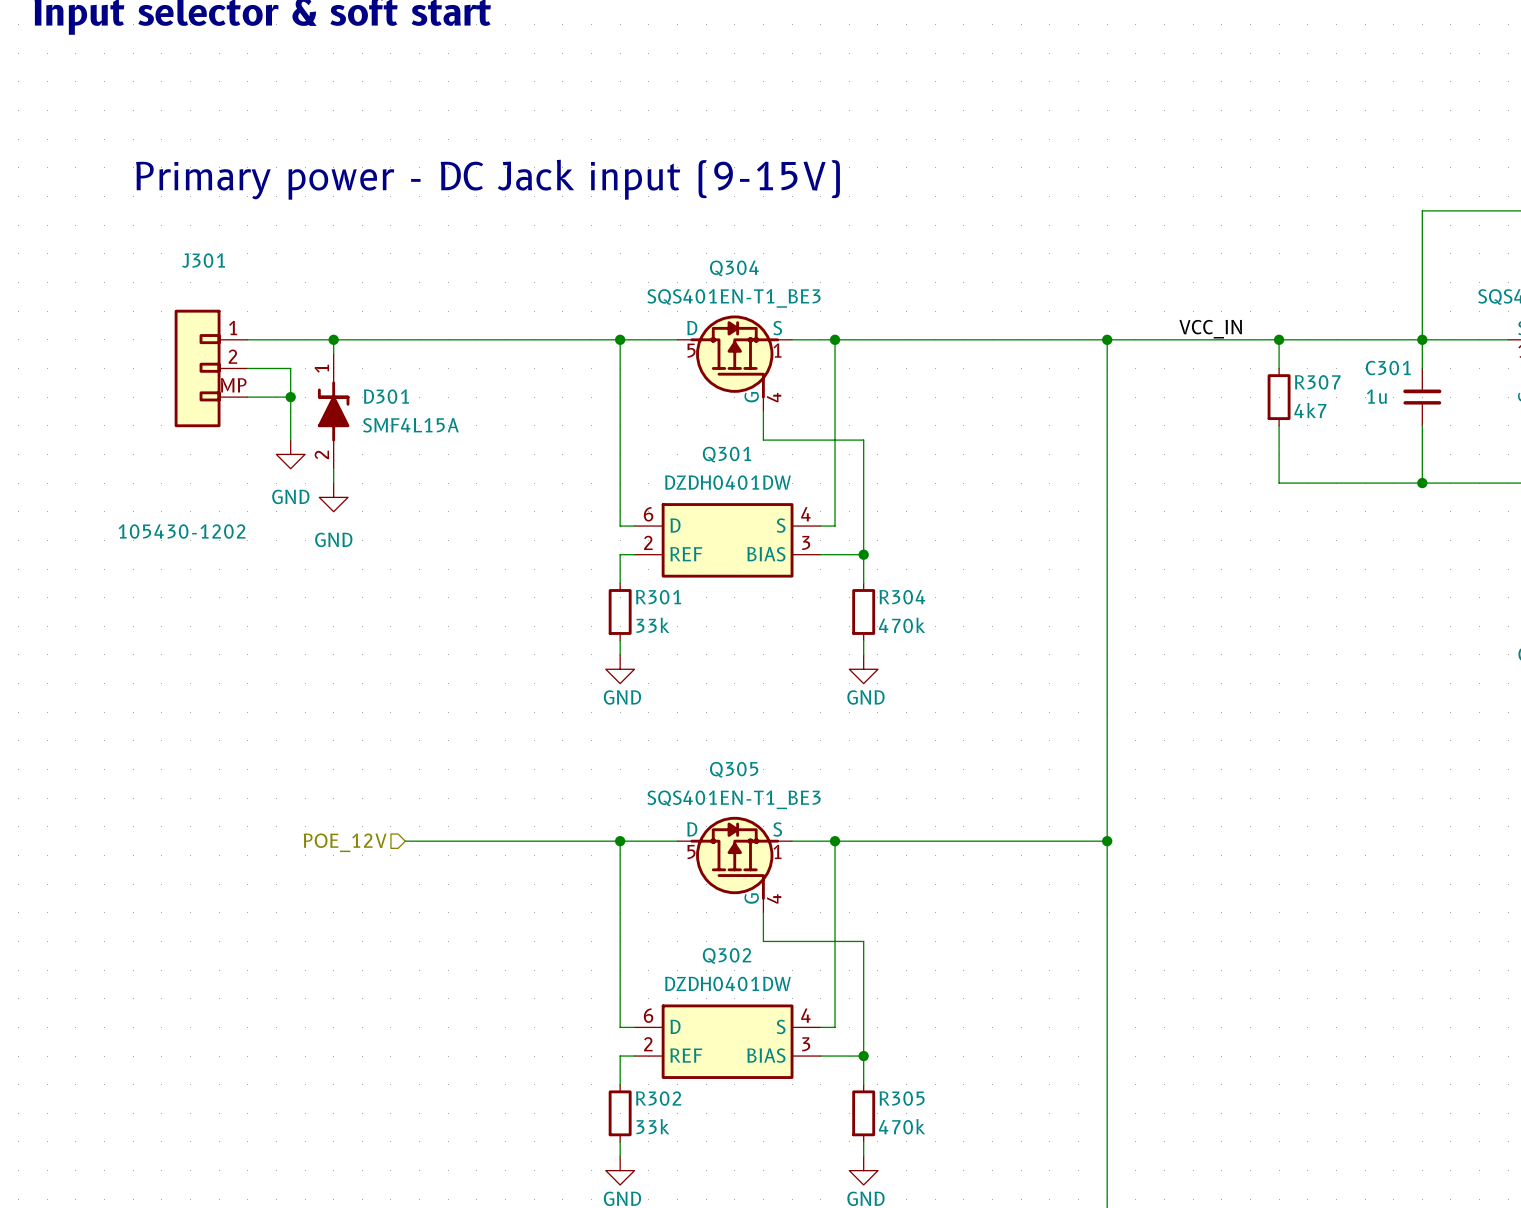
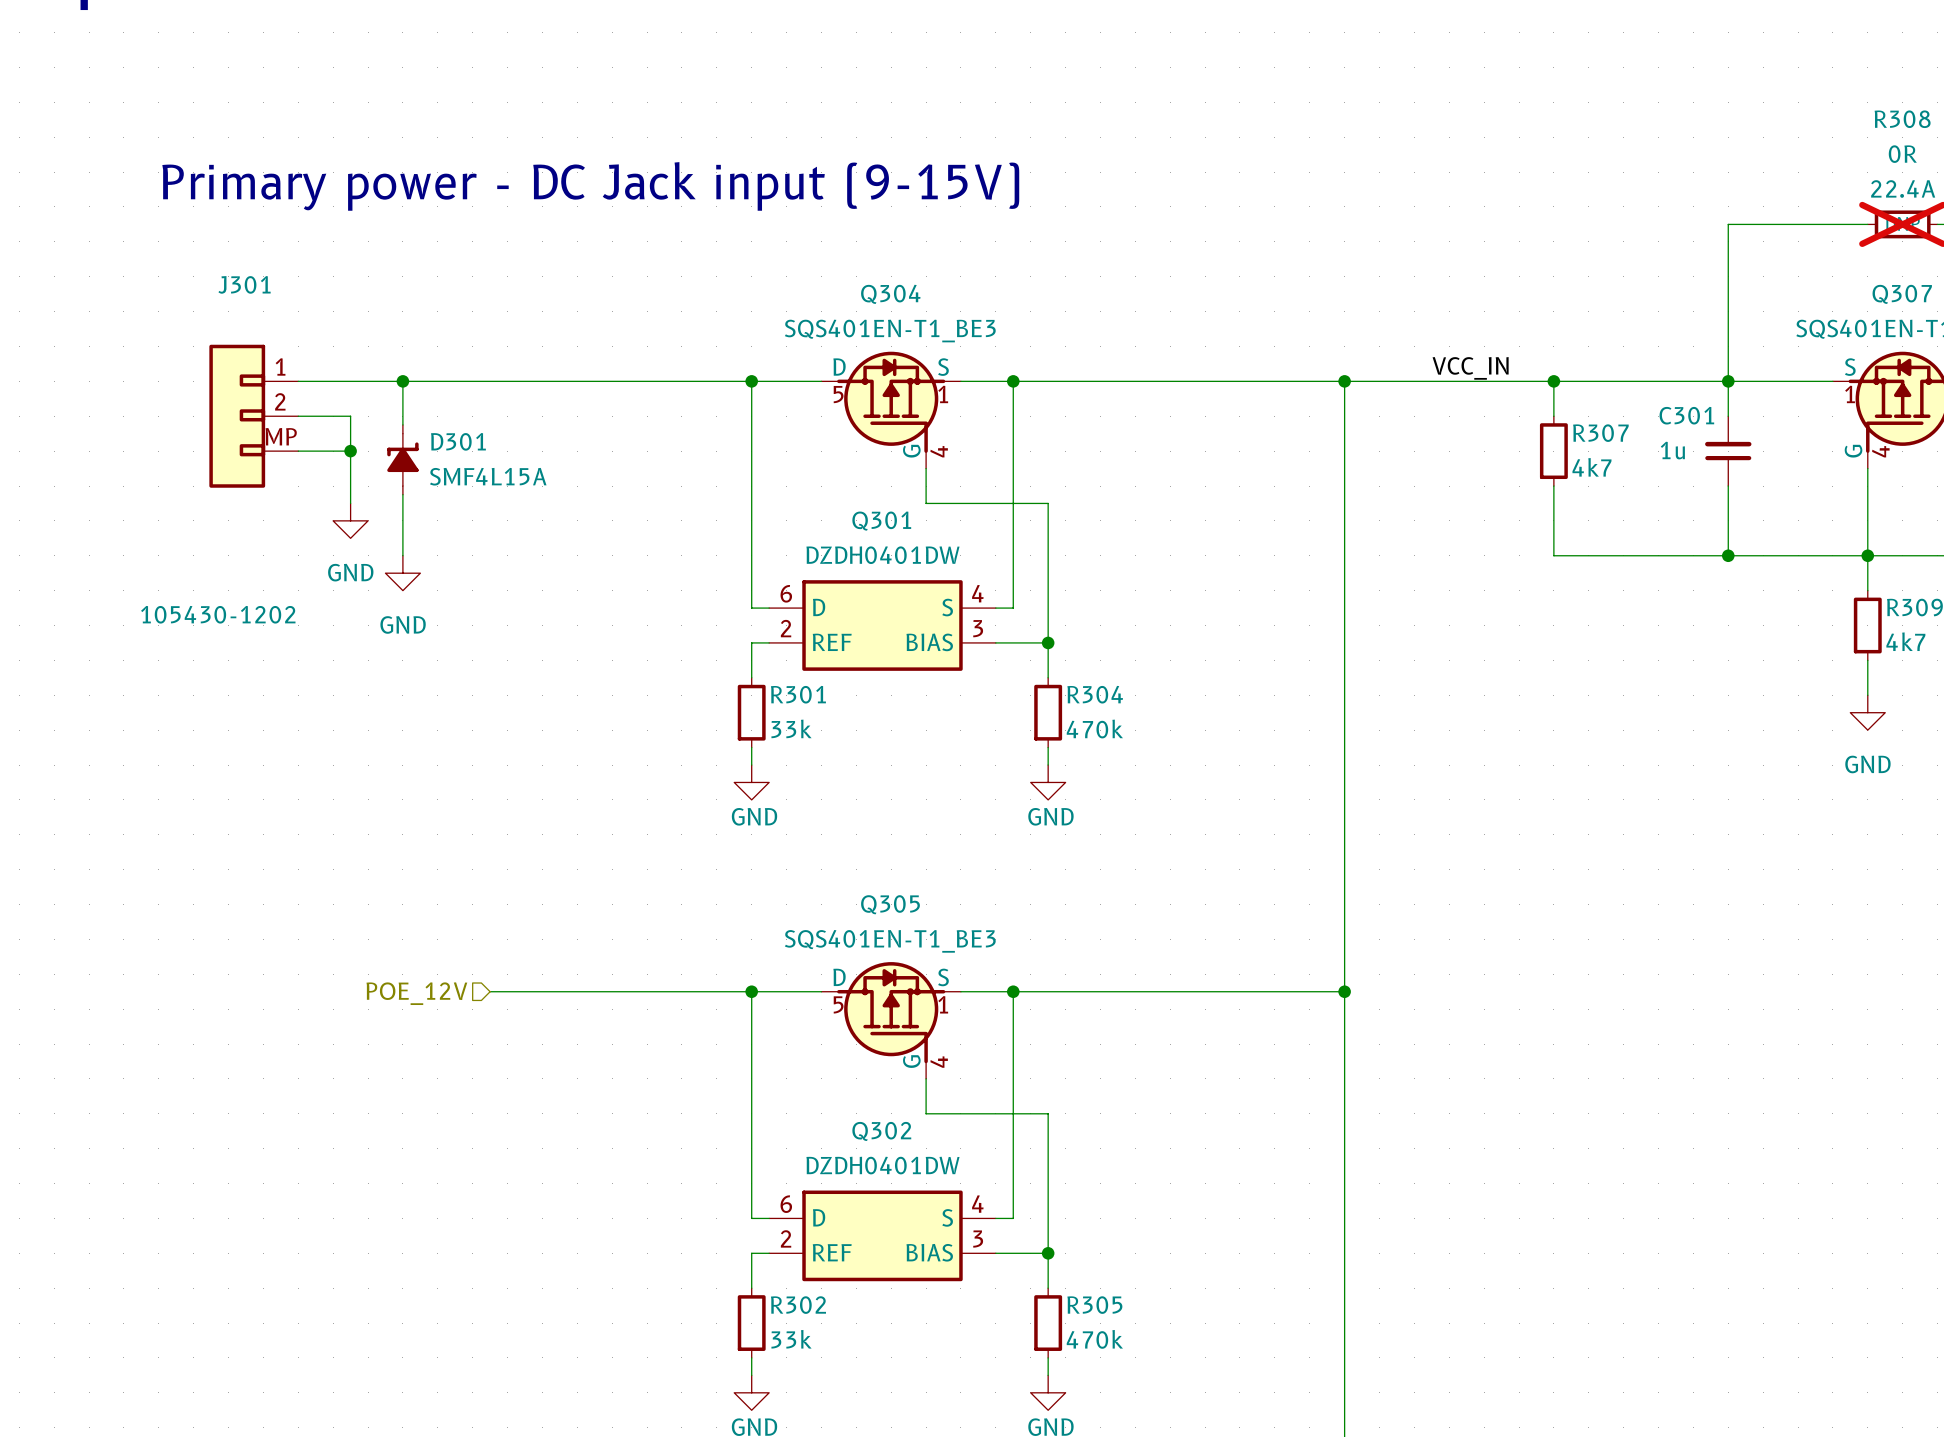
D301 symbol: [317, 354, 350, 469] -> [387, 424, 419, 495]

